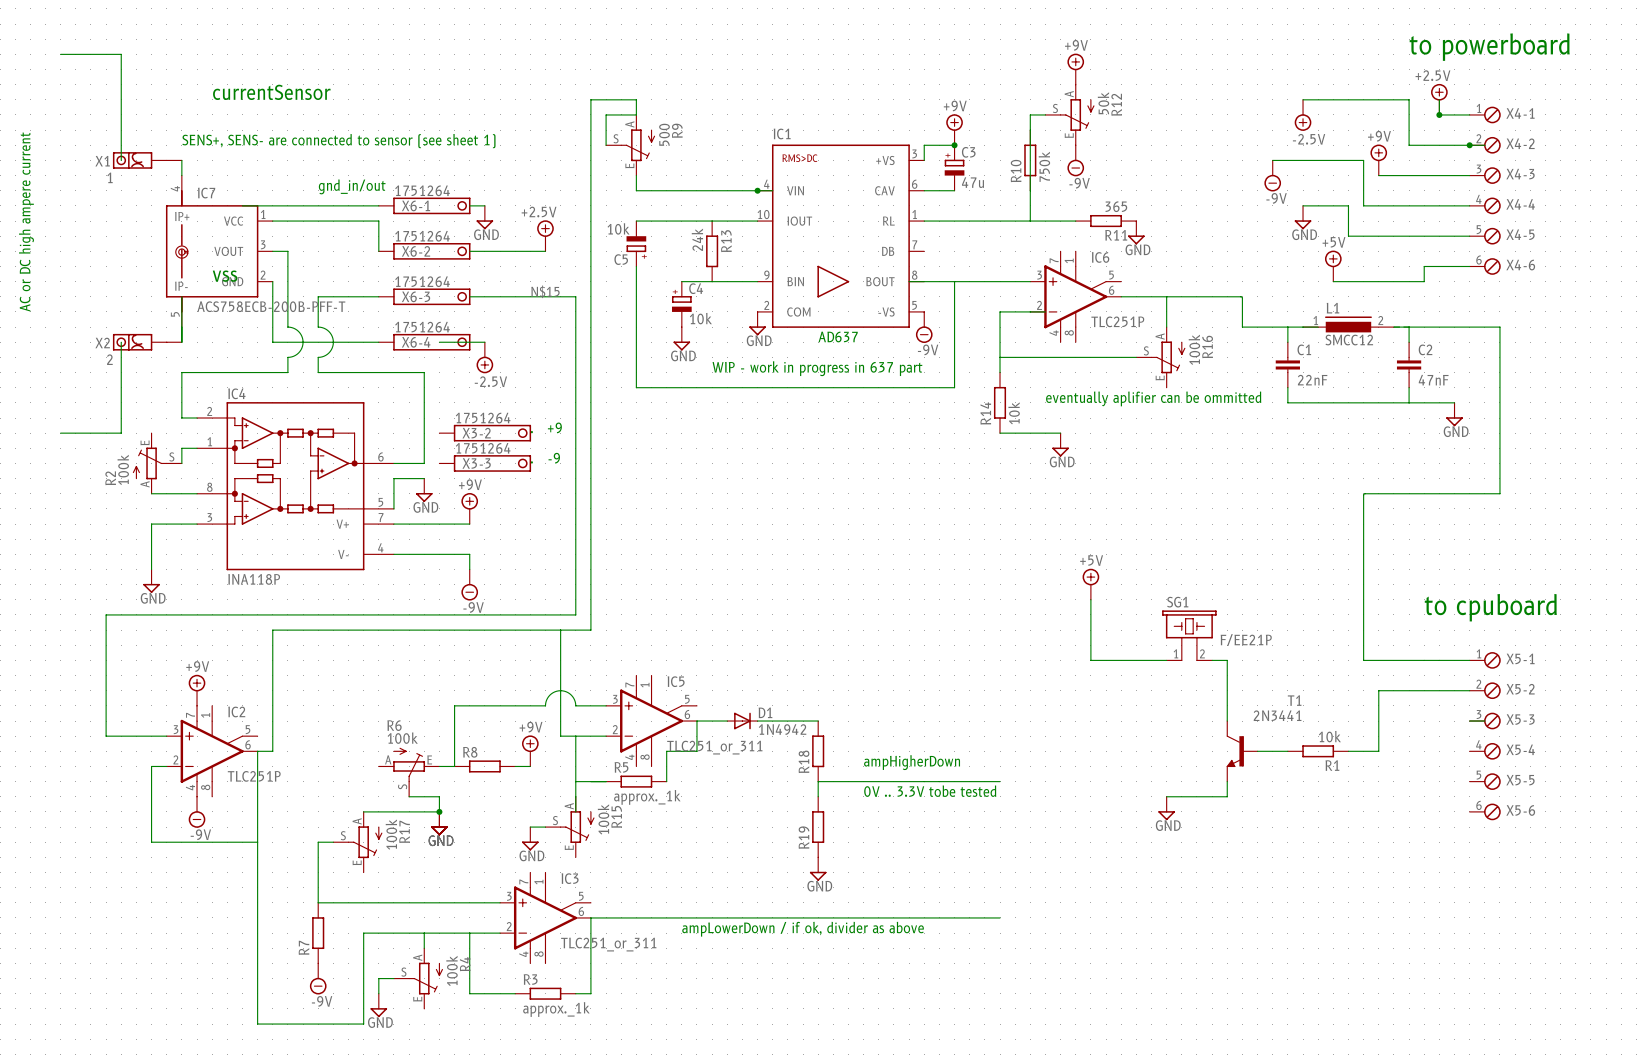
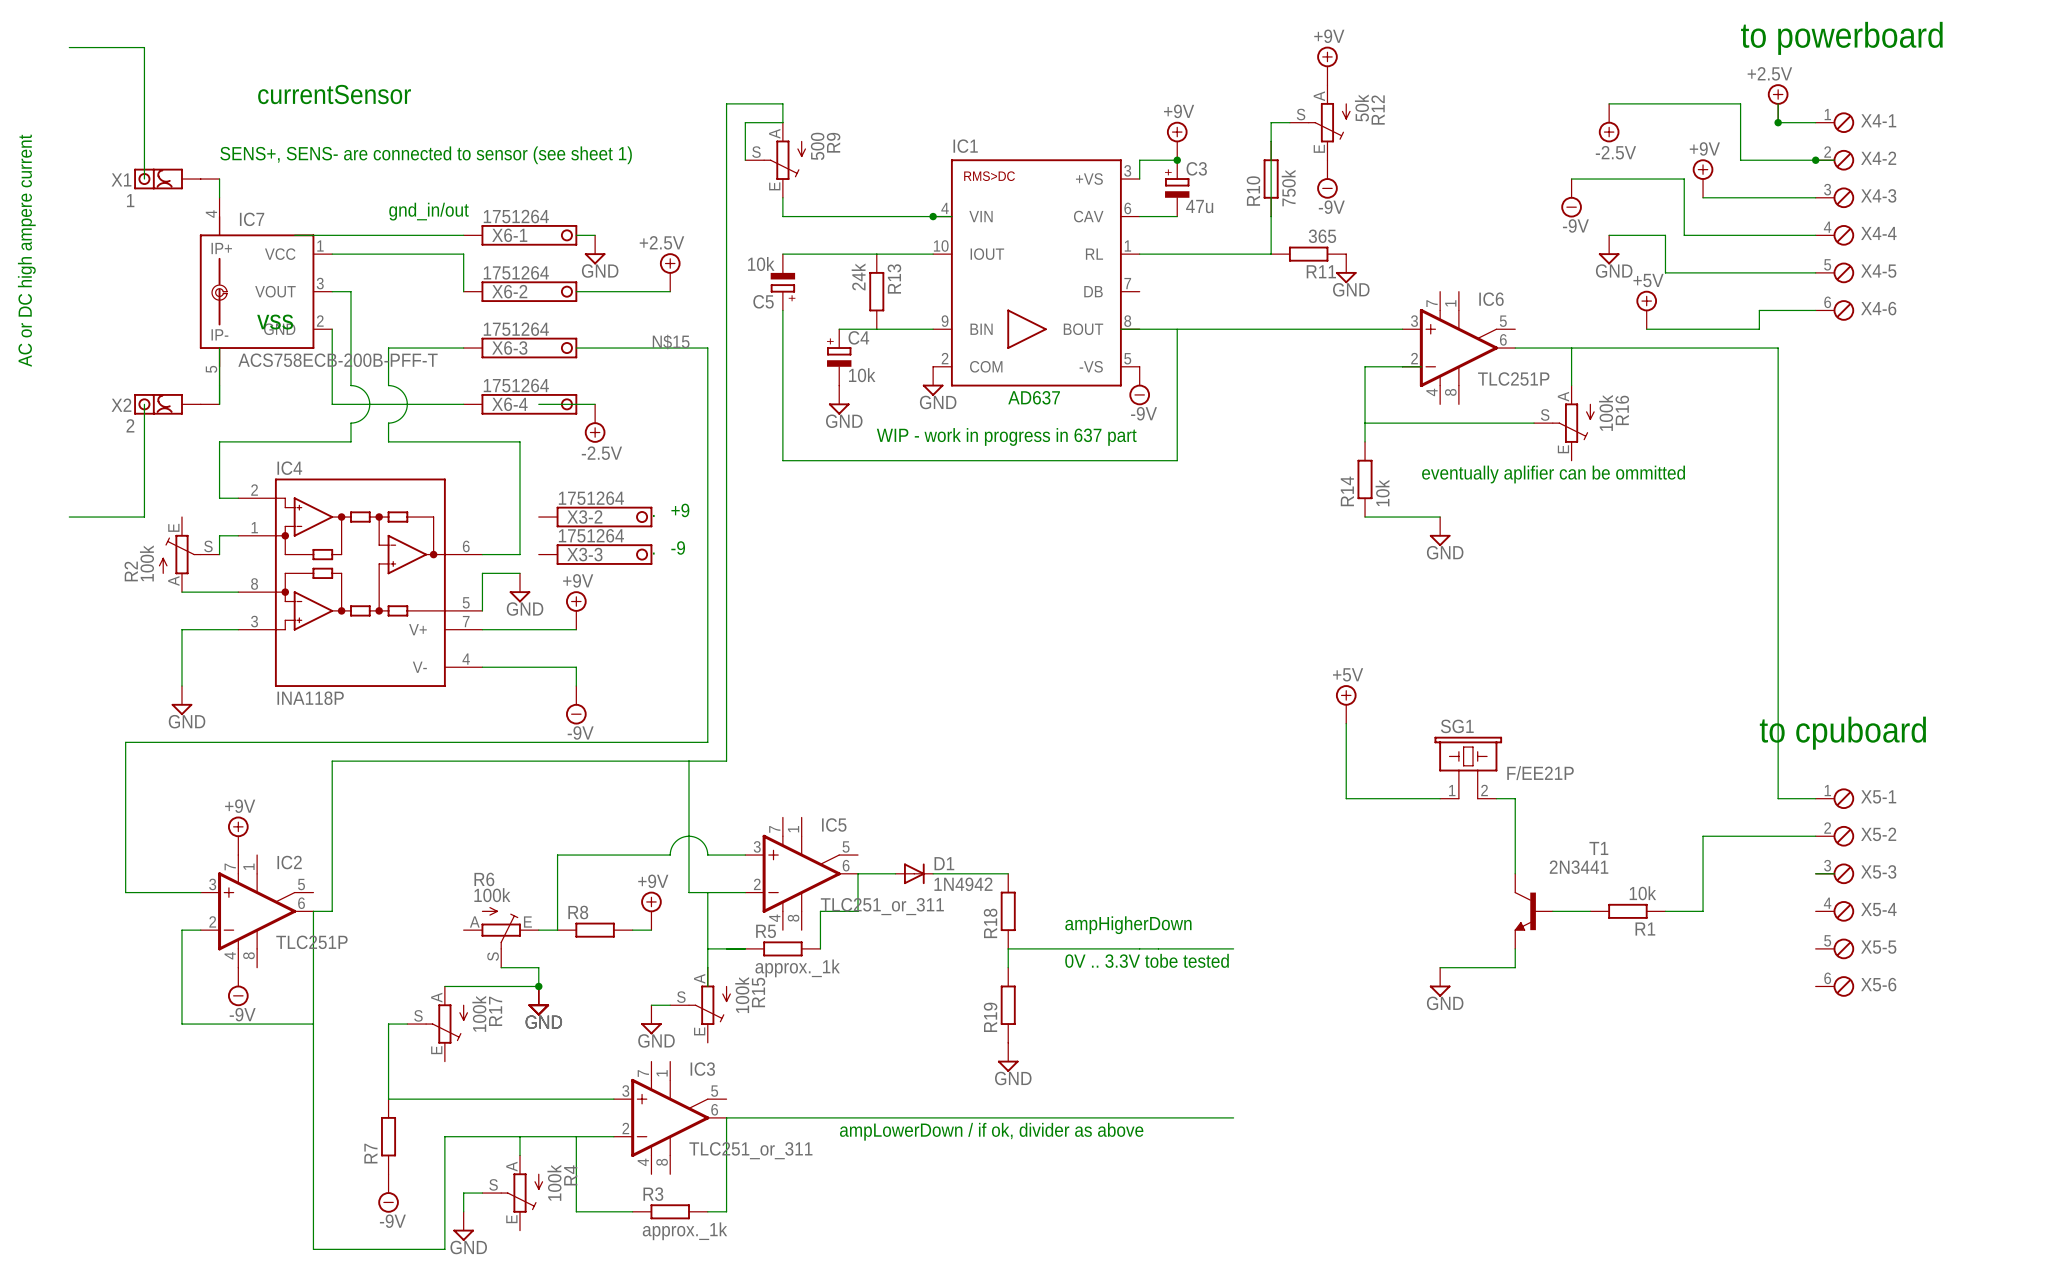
wire: (1030, 221) (1075, 221) -> none
R11 position: (1106, 221) -> (1308, 254)
power symbol position: GND (1136, 232) -> GND (1346, 268)
IC6 position: (1075, 296) -> (1458, 348)
wire: (1121, 296) (1227, 296) -> (1402, 423) (1534, 423)
wire: (1166, 296) (1166, 327) -> (1571, 348) (1571, 385)
wire: (1240, 296) (1242, 327) (1318, 327) -> none
wire: (1045, 311) (1000, 311) (1000, 372) -> (1421, 366) (1365, 366) (1365, 441)
L1: SMCC12 (1348, 324) -> none
wire: (1287, 327) (1287, 342) -> none
wire: (1409, 342) (1409, 327) (1393, 327) (1499, 327) (1499, 493) (1363, 495) (1363, 660) (1439, 660) -> (1532, 348) (1778, 348) (1778, 798)
wire: (1000, 357) (1106, 357) -> (1271, 329) (1402, 329)
R16 position: (1160, 357) -> (1564, 423)
C1: 22nF (1287, 364) -> none
C2: 47nF (1409, 364) -> none
wire: (1287, 387) (1287, 402) (1454, 402) -> none
wire: (1409, 387) (1409, 402) -> none
text position: eventually aplifier can be ommitted (1153, 398) -> eventually aplifier can be ommitted (1553, 474)
R14 position: (1000, 402) -> (1365, 479)
power symbol: GND (1454, 414) -> none
wire: (1000, 433) (1060, 433) -> (1365, 517) (1440, 517)
power symbol position: GND (1060, 444) -> GND (1440, 531)

